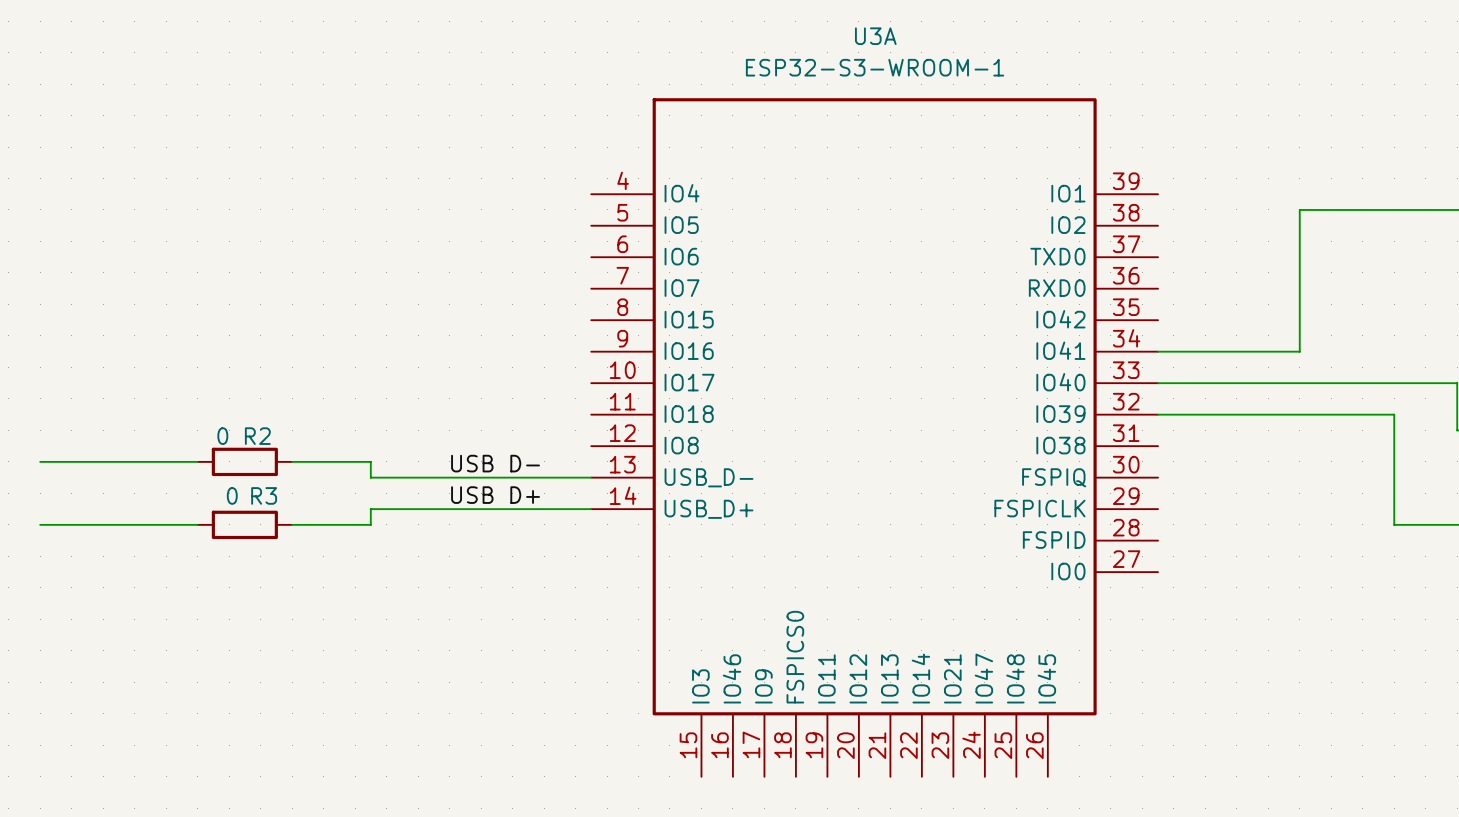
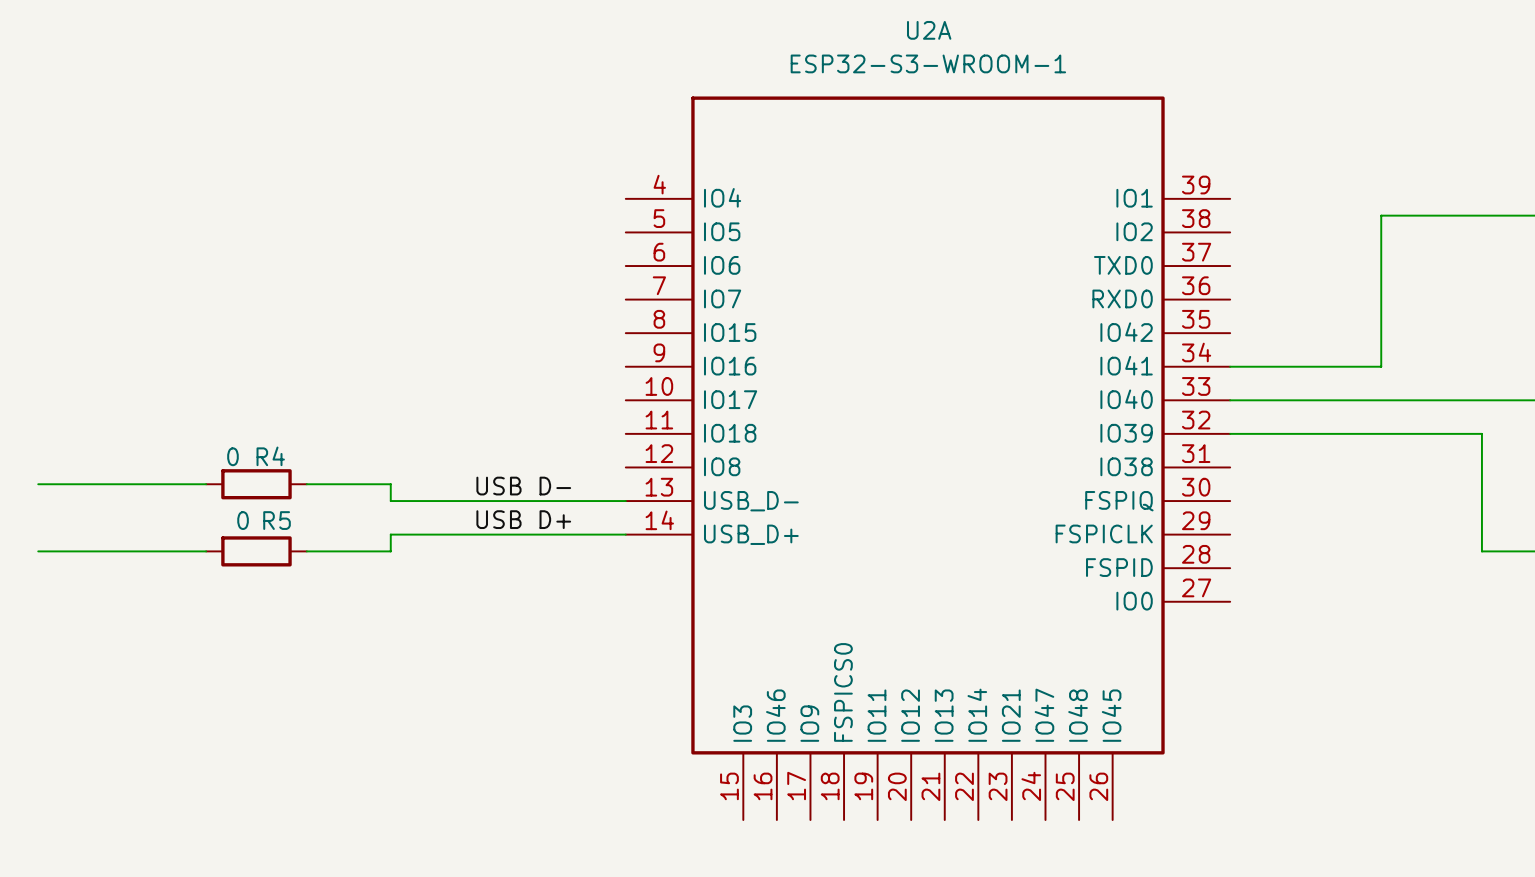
U3A name: U3A (875, 36) -> U2A (929, 30)
R2 name: R2 (257, 436) -> R4 (270, 456)
R3 name: R3 (264, 495) -> R5 (277, 520)

